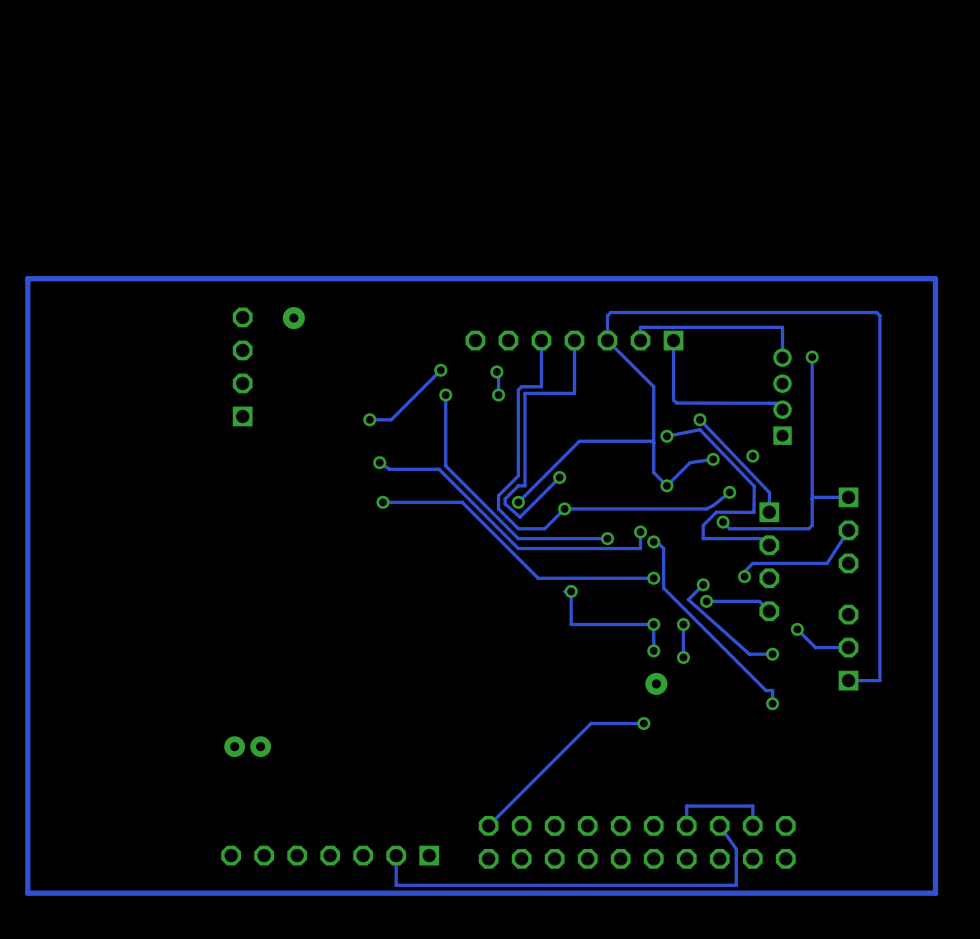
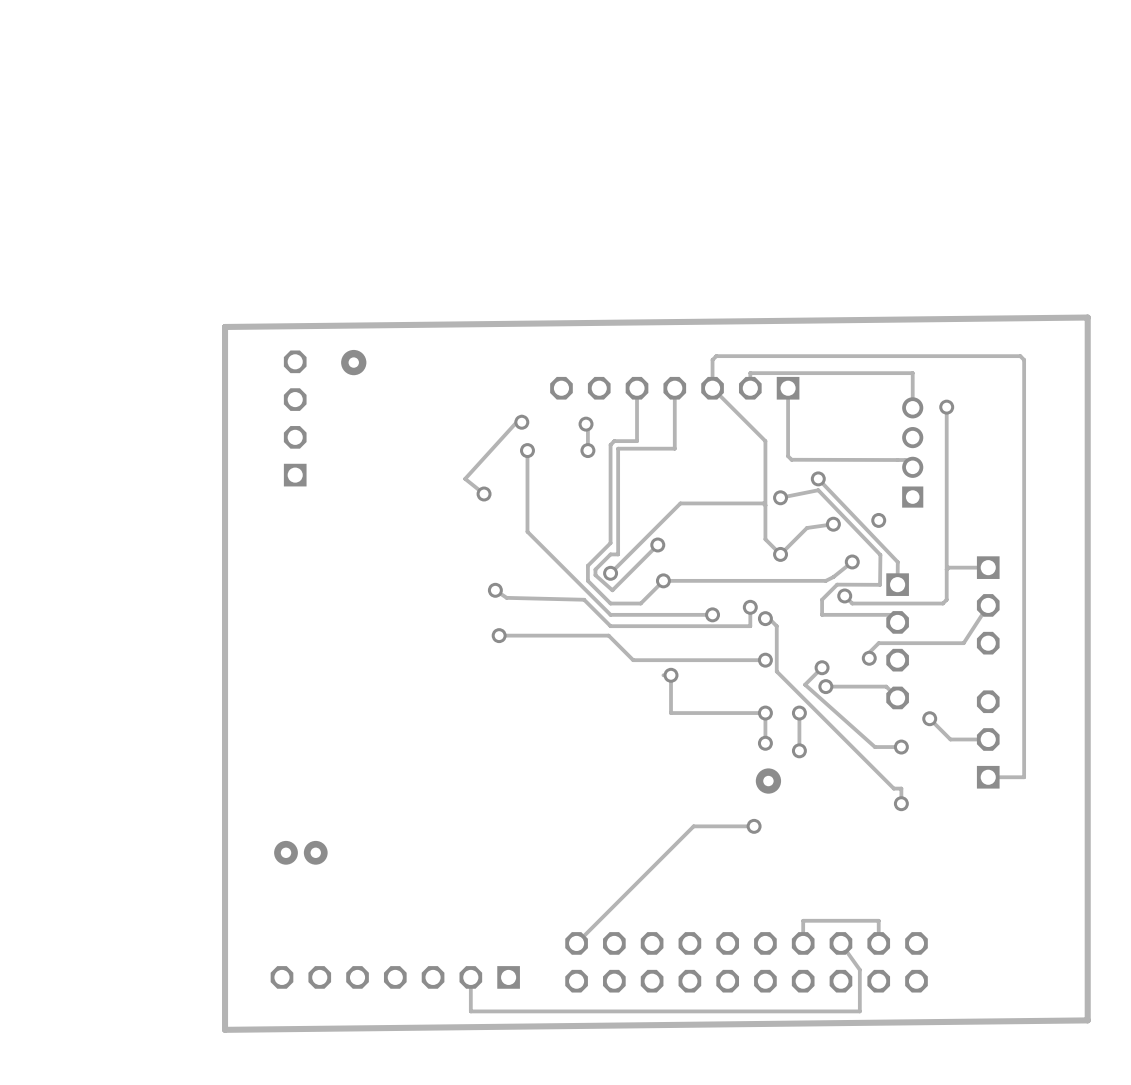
track: (935, 278) (27, 278) (27, 893) (935, 893) -> (1087, 317) (225, 326) (225, 1029) (1087, 1020)
track: none -> (521, 416) (465, 478) (484, 494)
track: (440, 370) (391, 419) (369, 419) -> none
via: (369, 419) -> none
via: none -> (484, 494)
track: (379, 462) (389, 469) (439, 469) (495, 525) -> (495, 590) (506, 597) (584, 599)
via: (379, 462) -> none
track: (383, 502) (462, 502) (516, 556) -> (499, 635) (608, 635)
via: (383, 502) -> none
via: none -> (495, 590)
via: none -> (499, 635)

